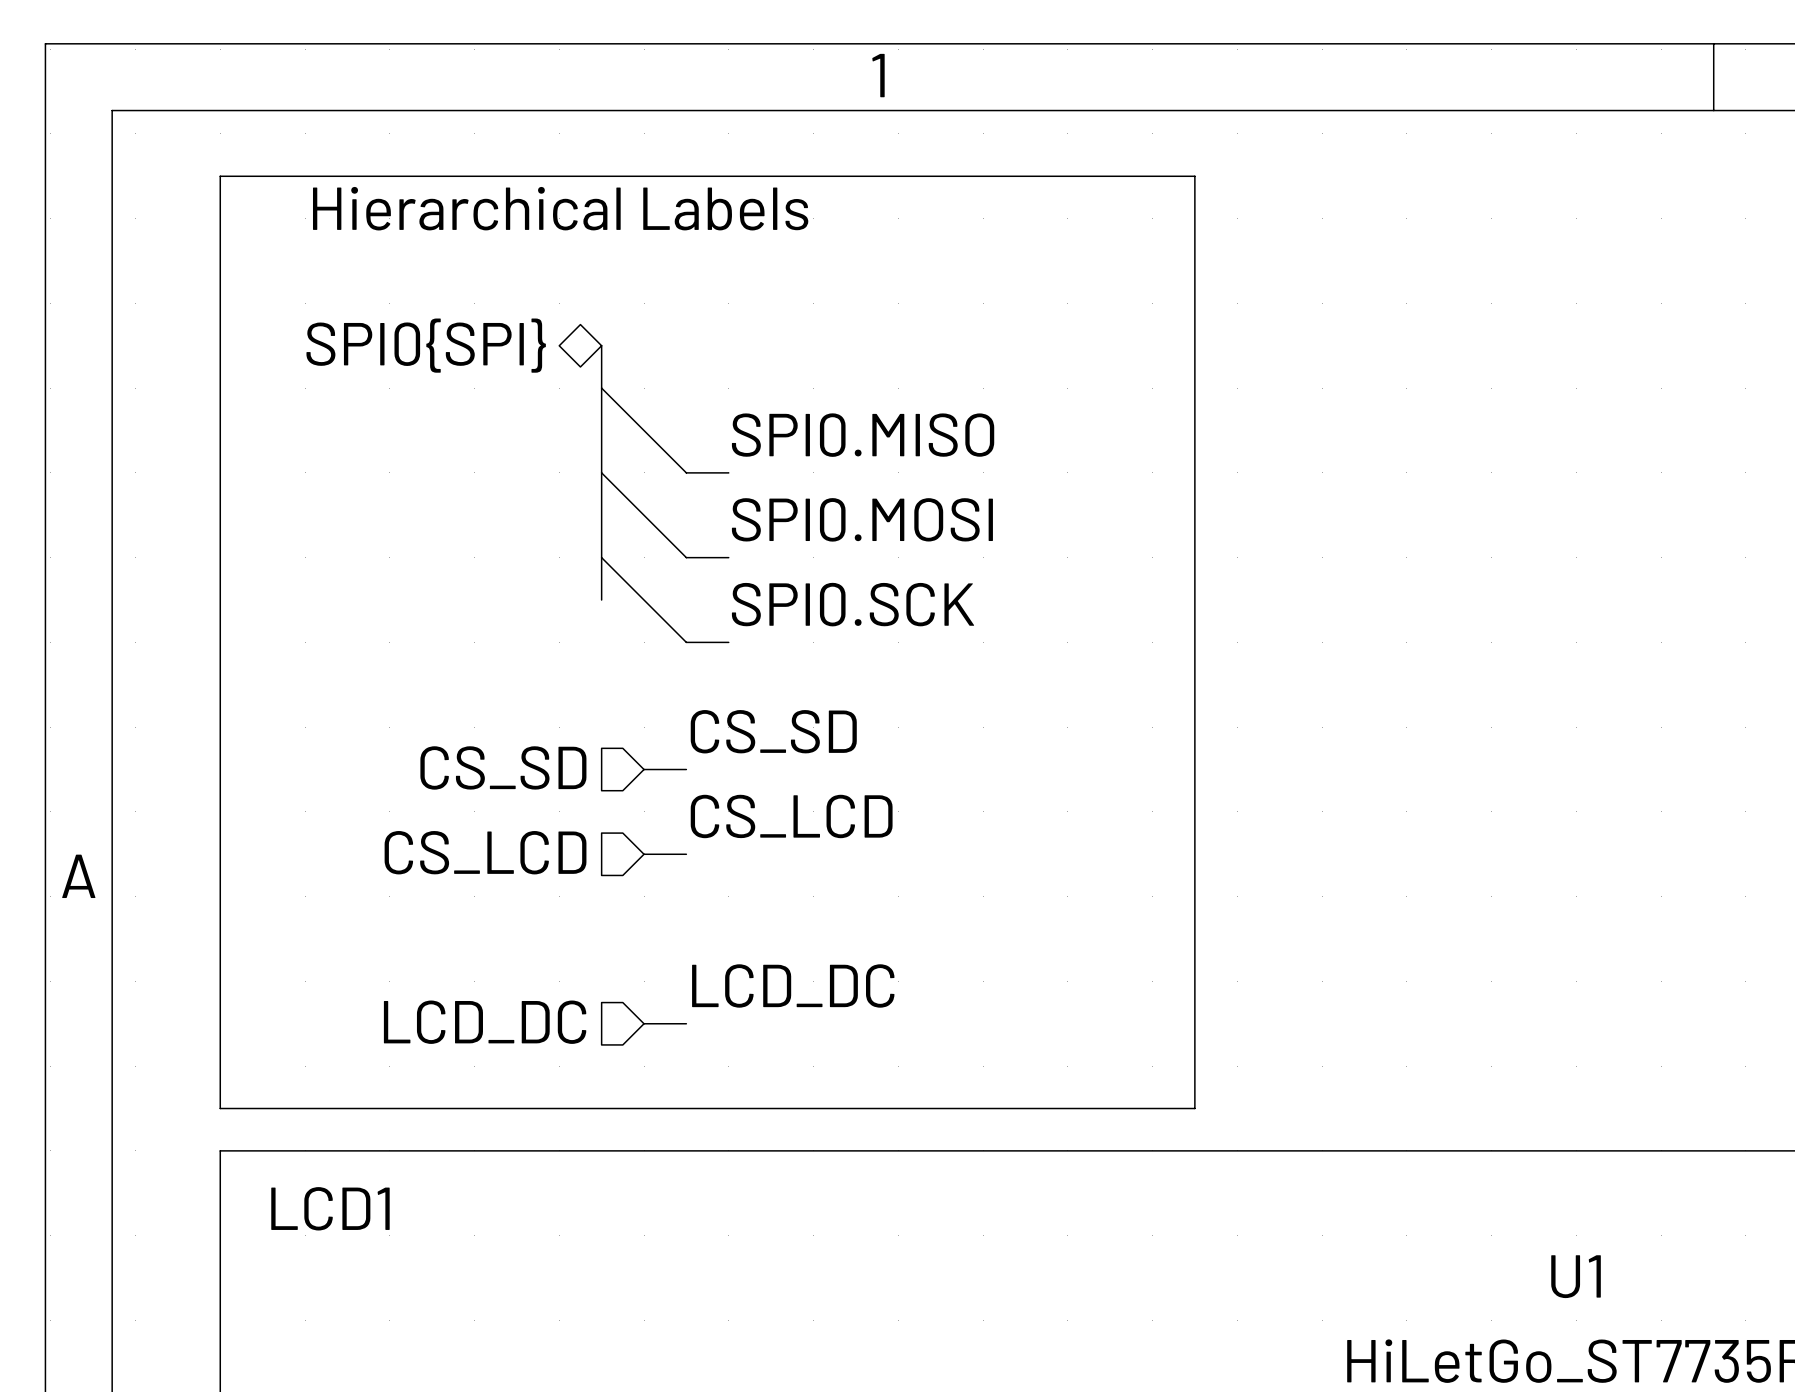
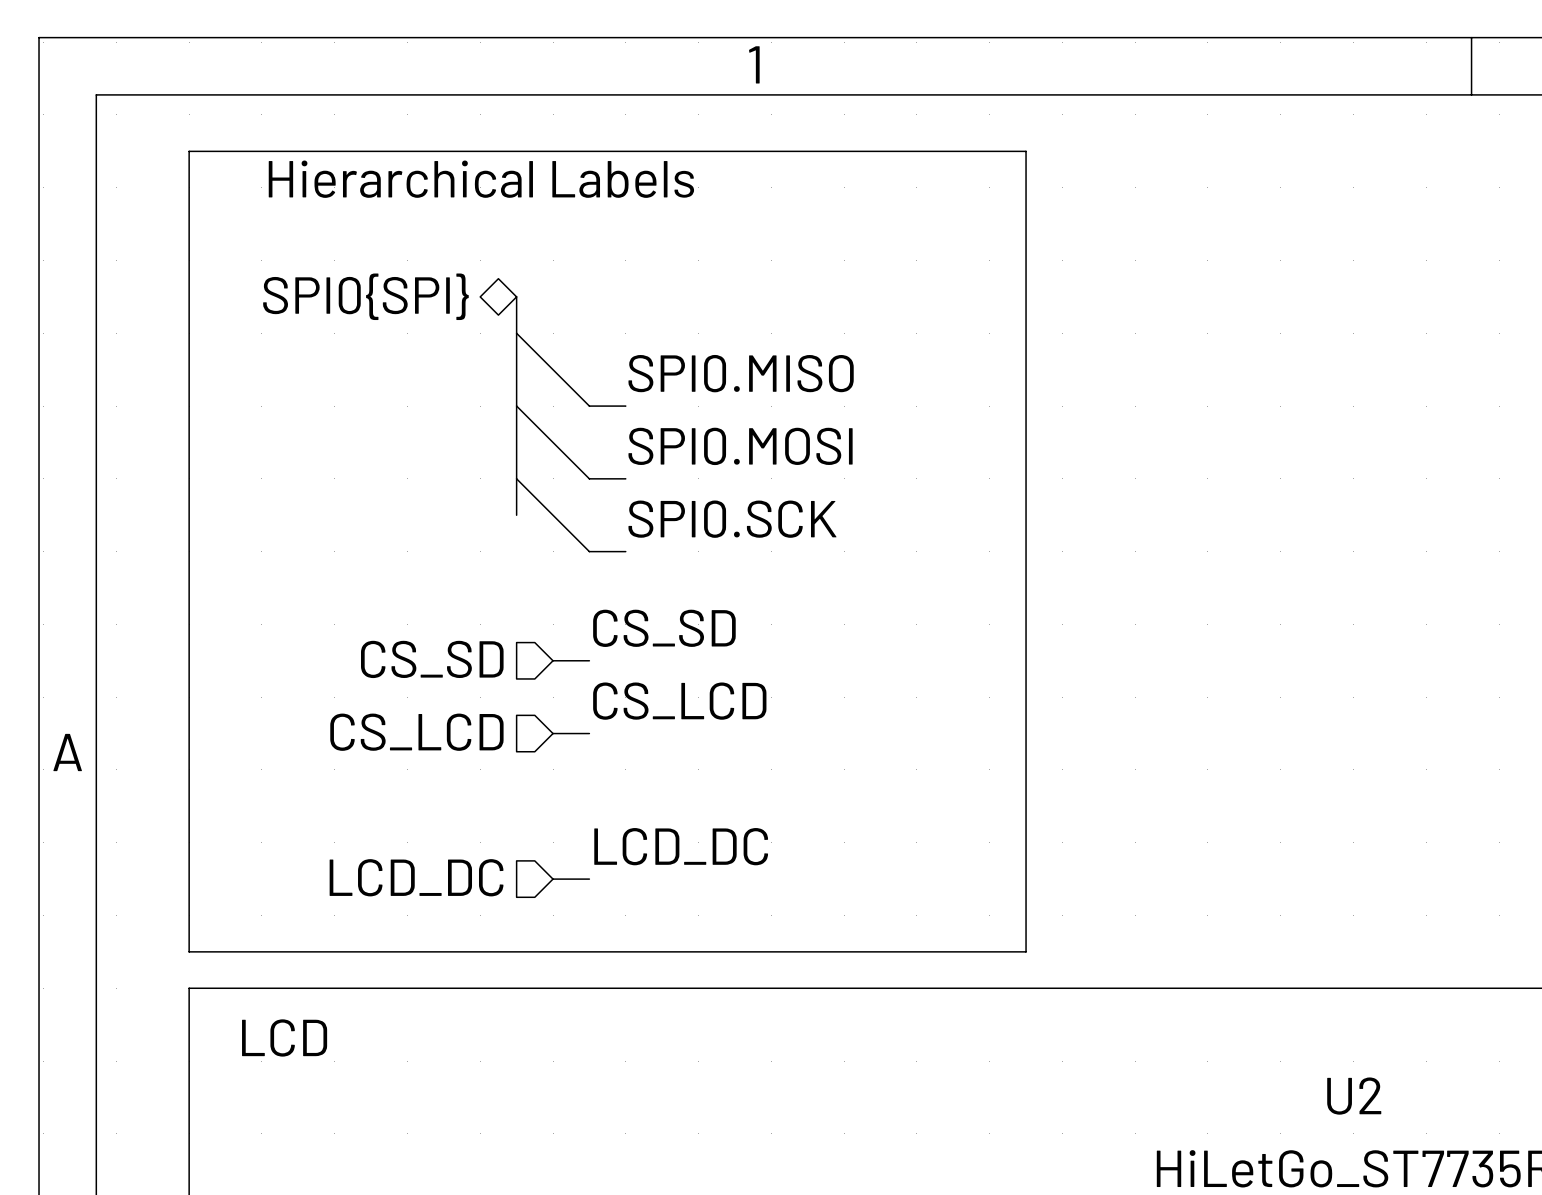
text: LCD1 (330, 1208) -> LCD (284, 1037)
U1 name: U1 (1576, 1276) -> U2 (1354, 1096)

